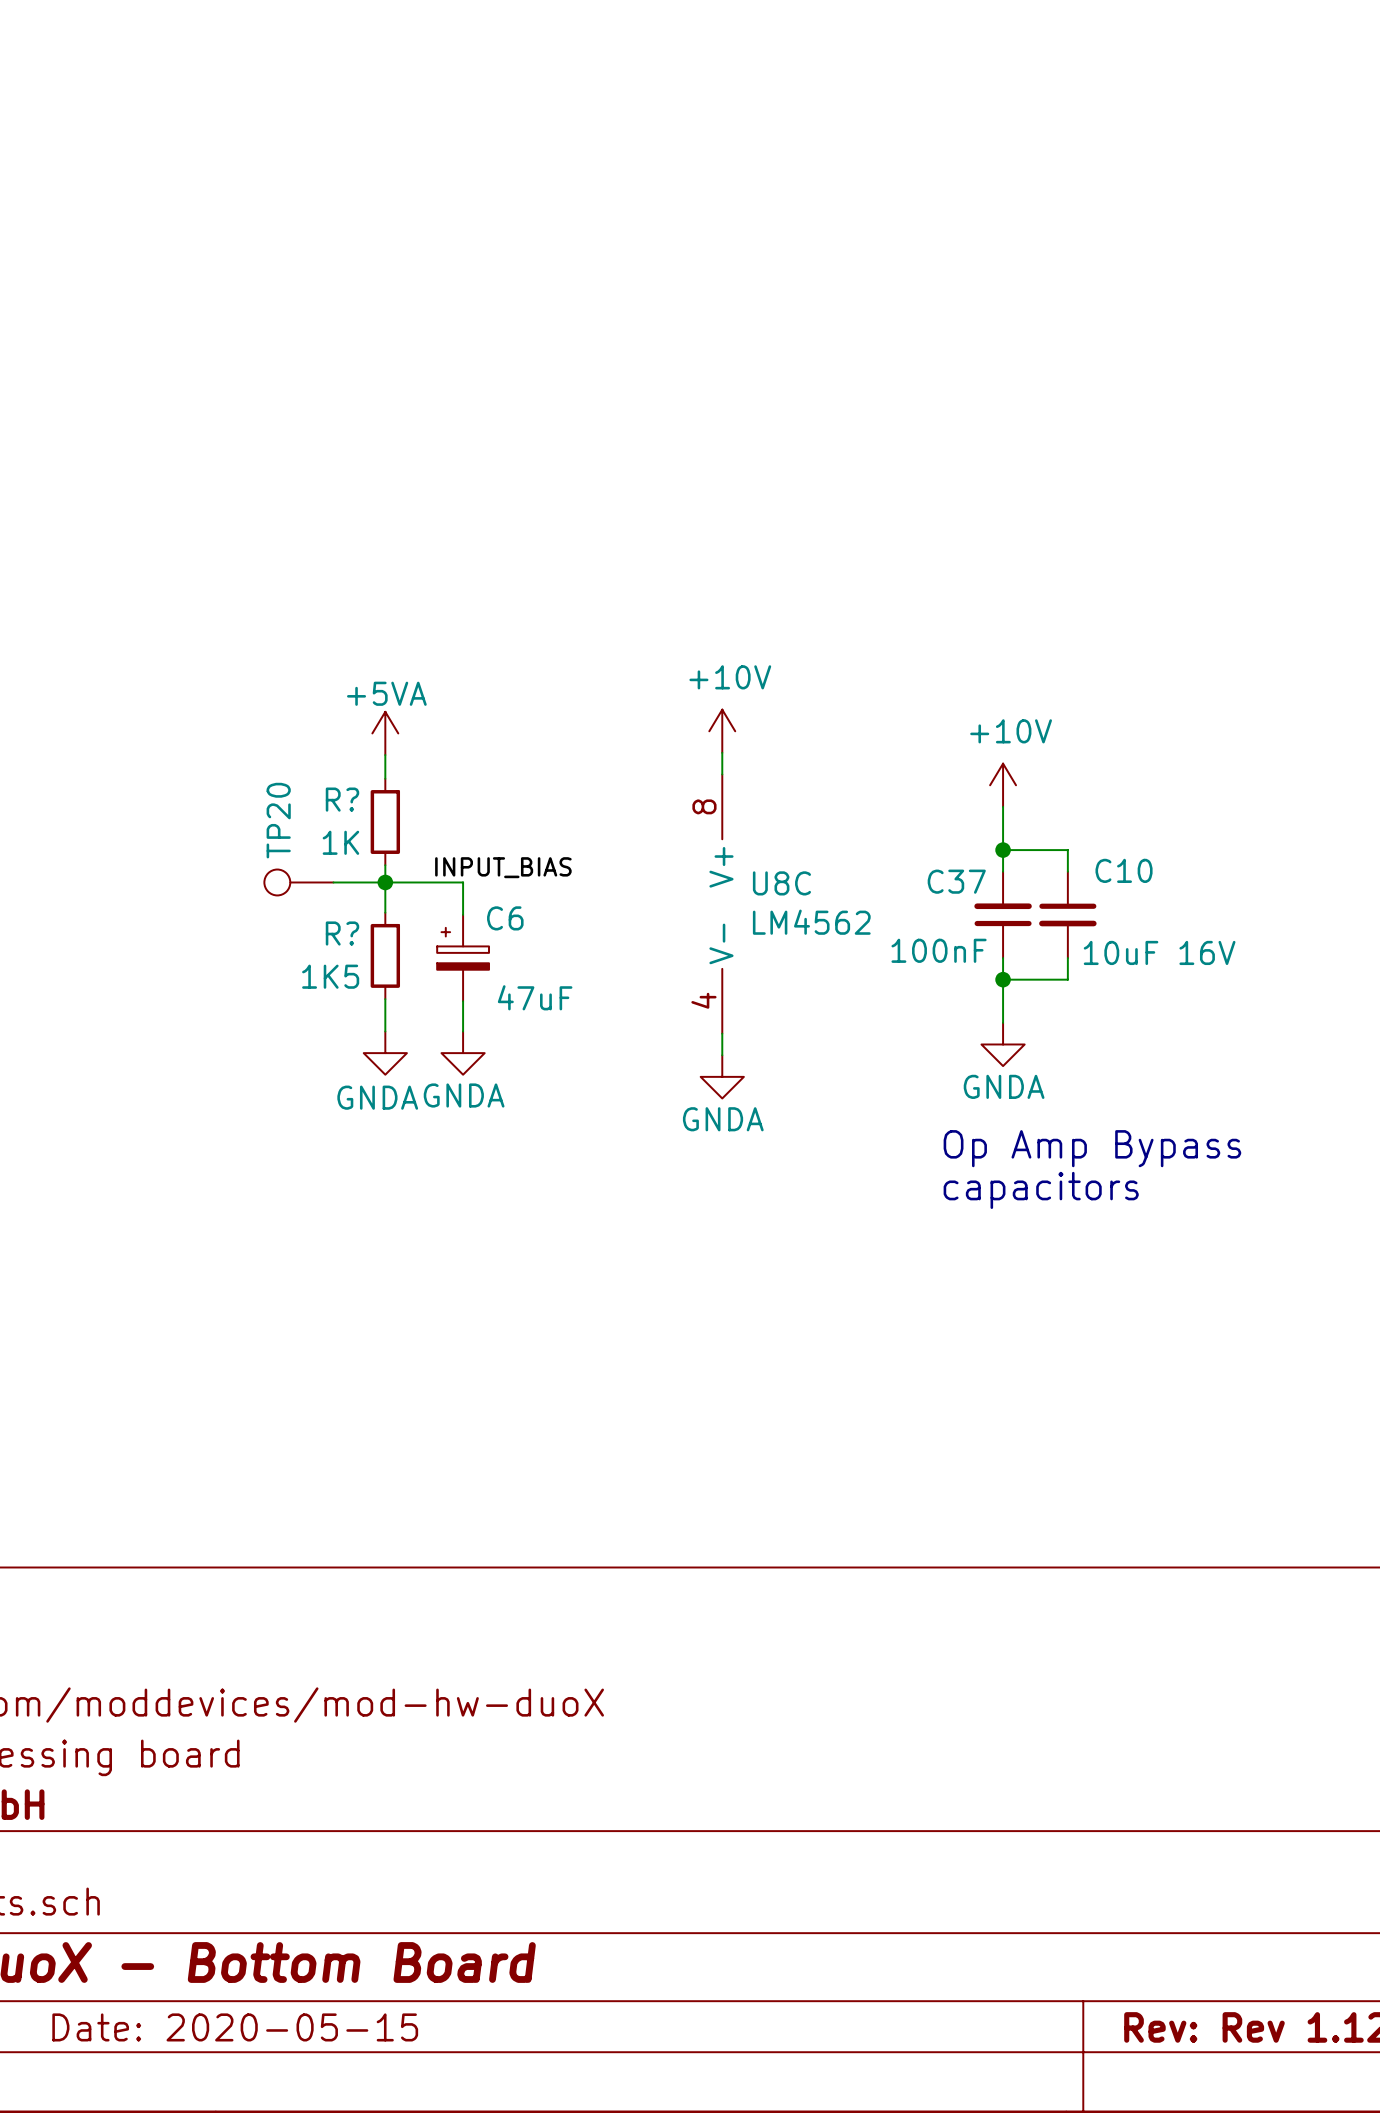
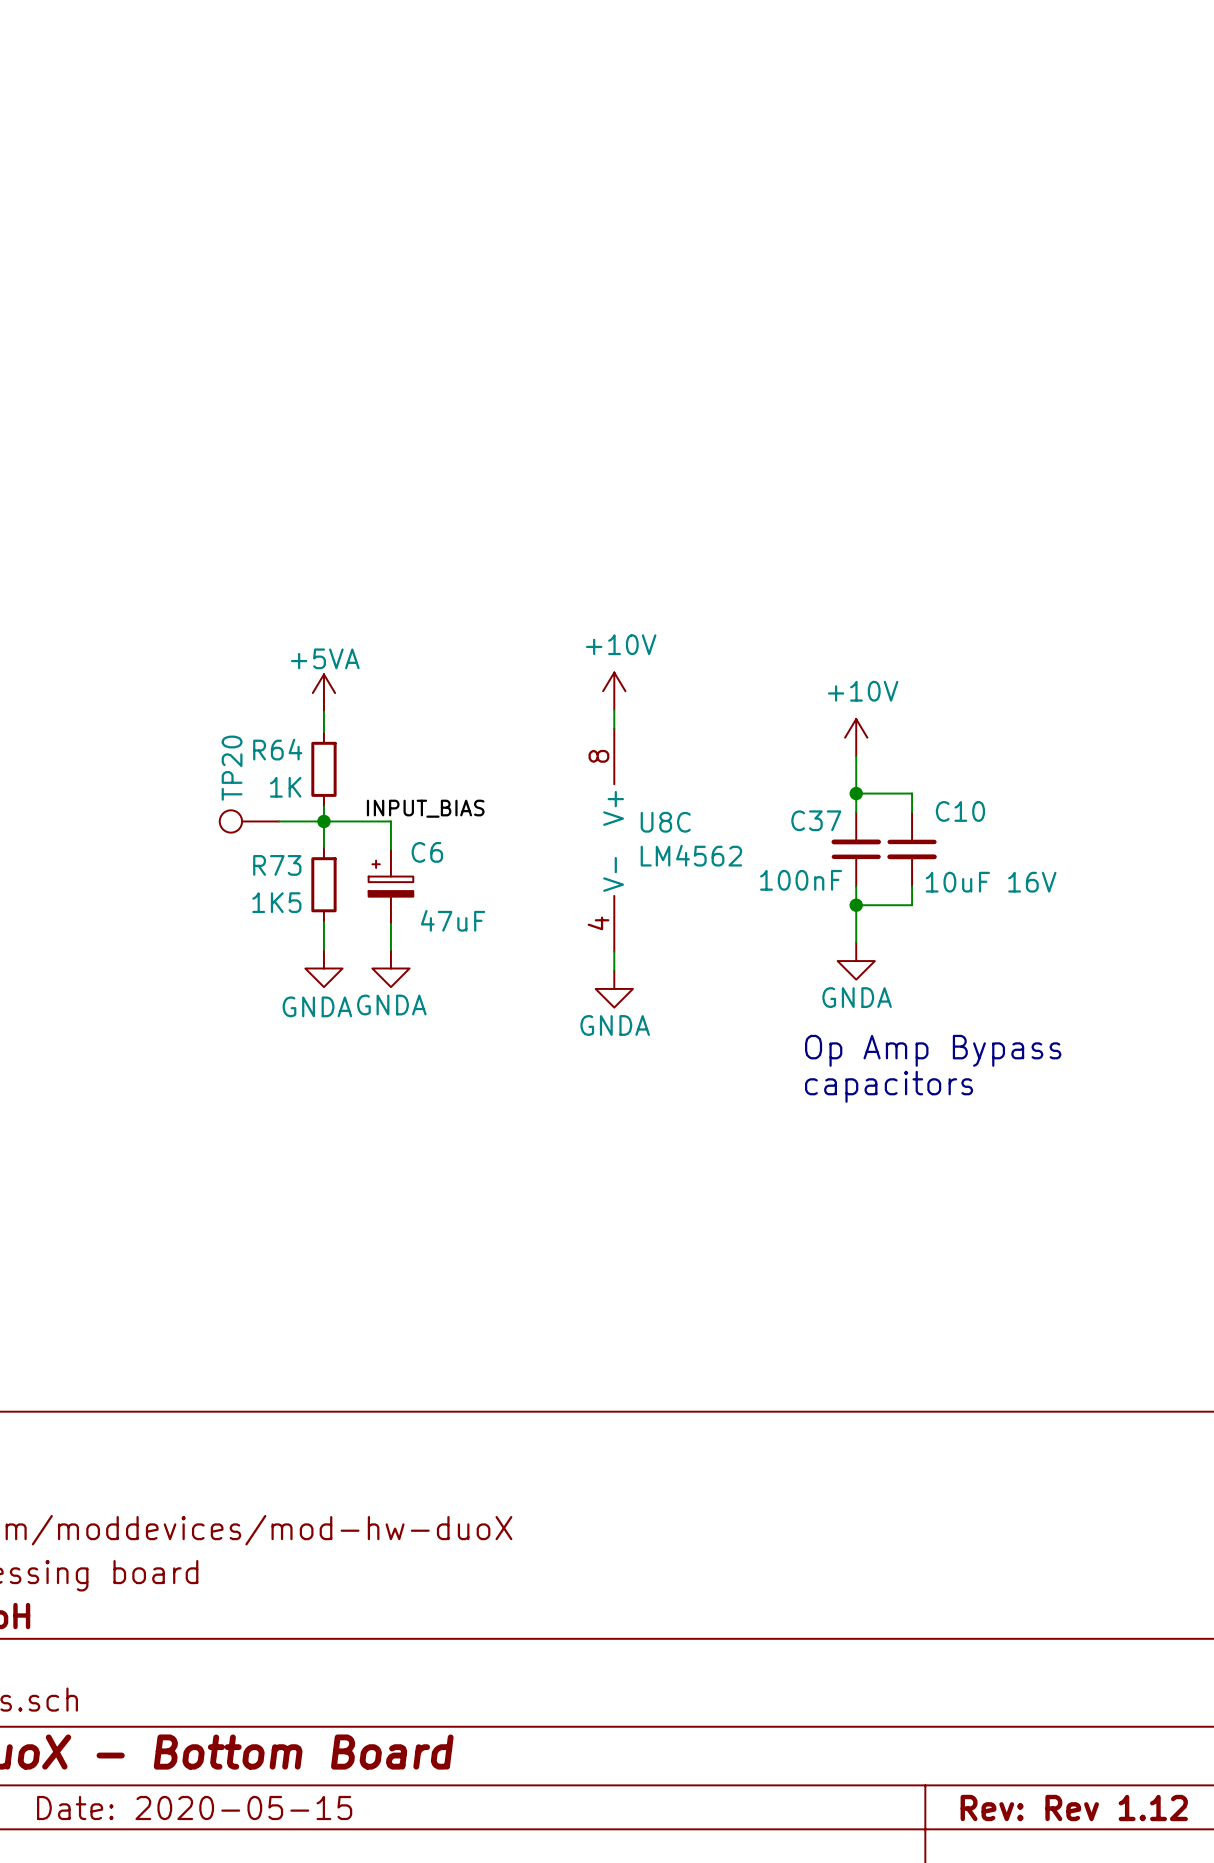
R? name: R? (342, 799) -> R64 (277, 749)
R? name: R? (342, 933) -> R73 (277, 865)

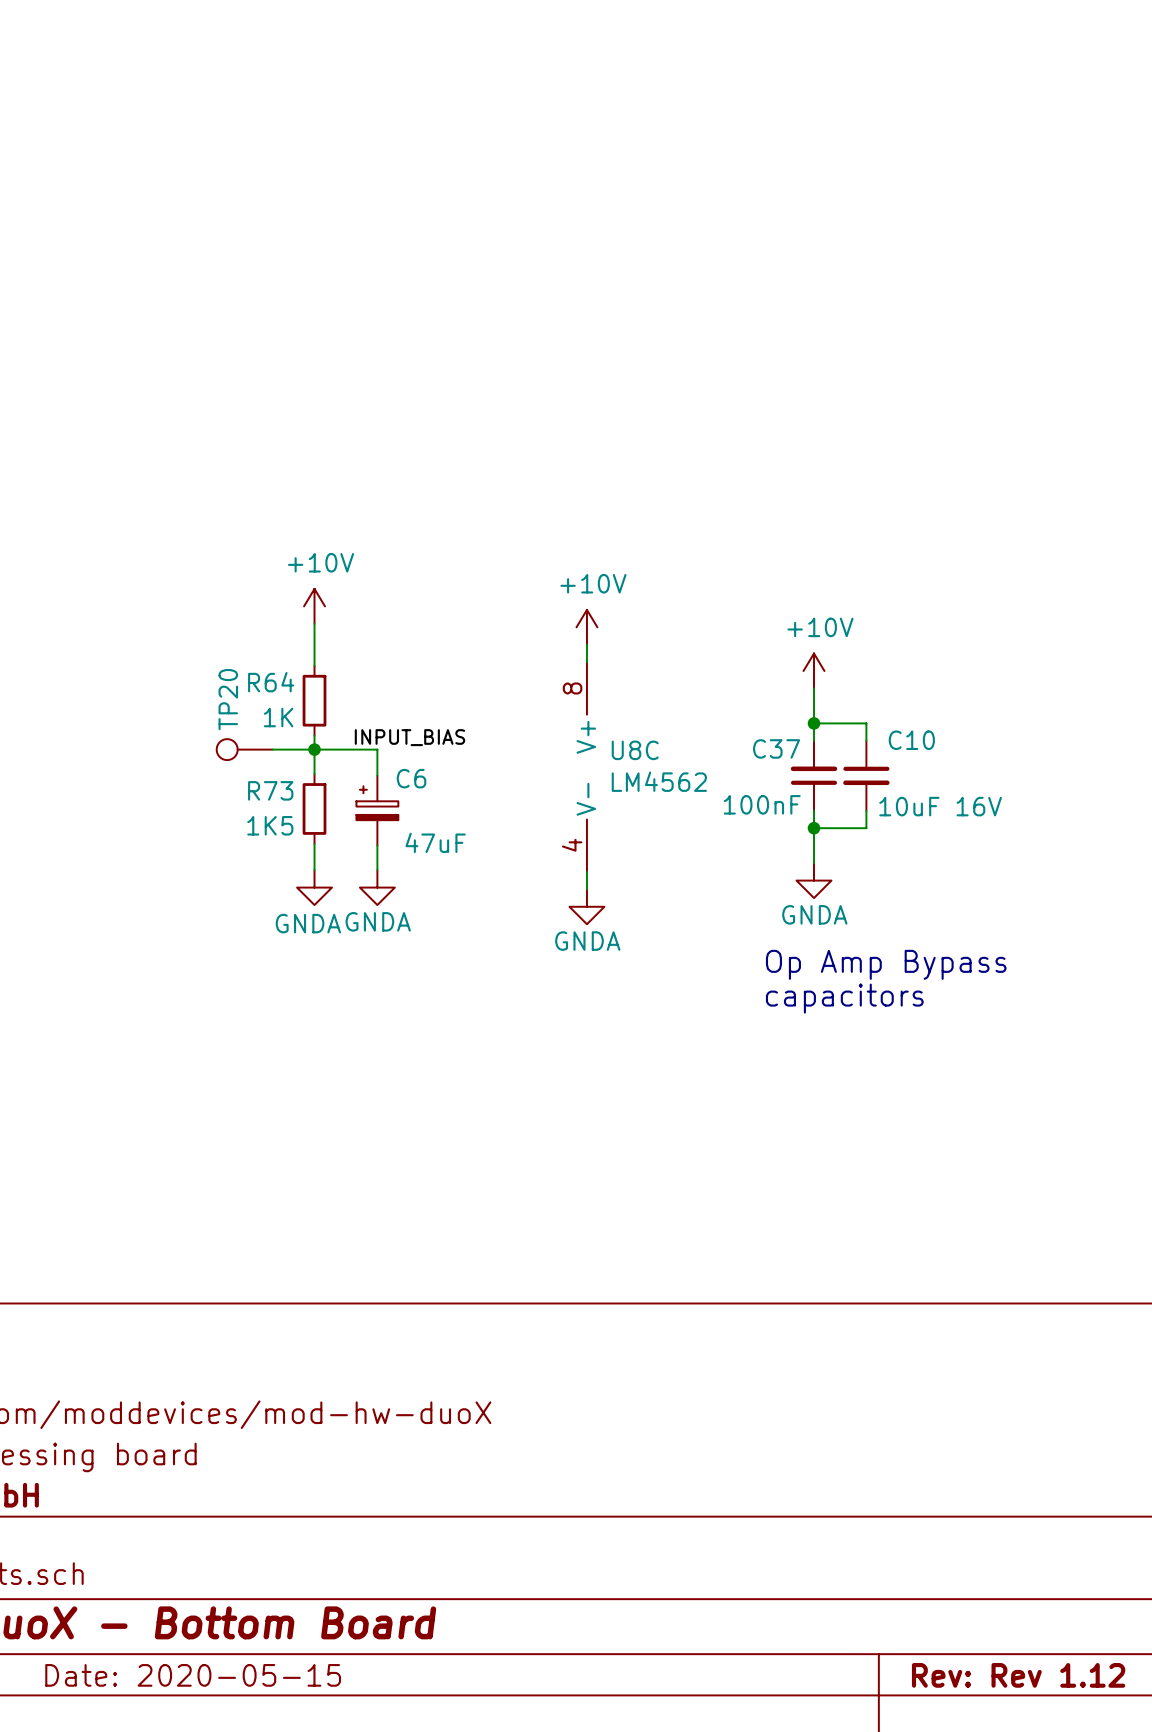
power symbol: none -> +10V (314, 606)
power symbol: +5VA (323, 693) -> none

